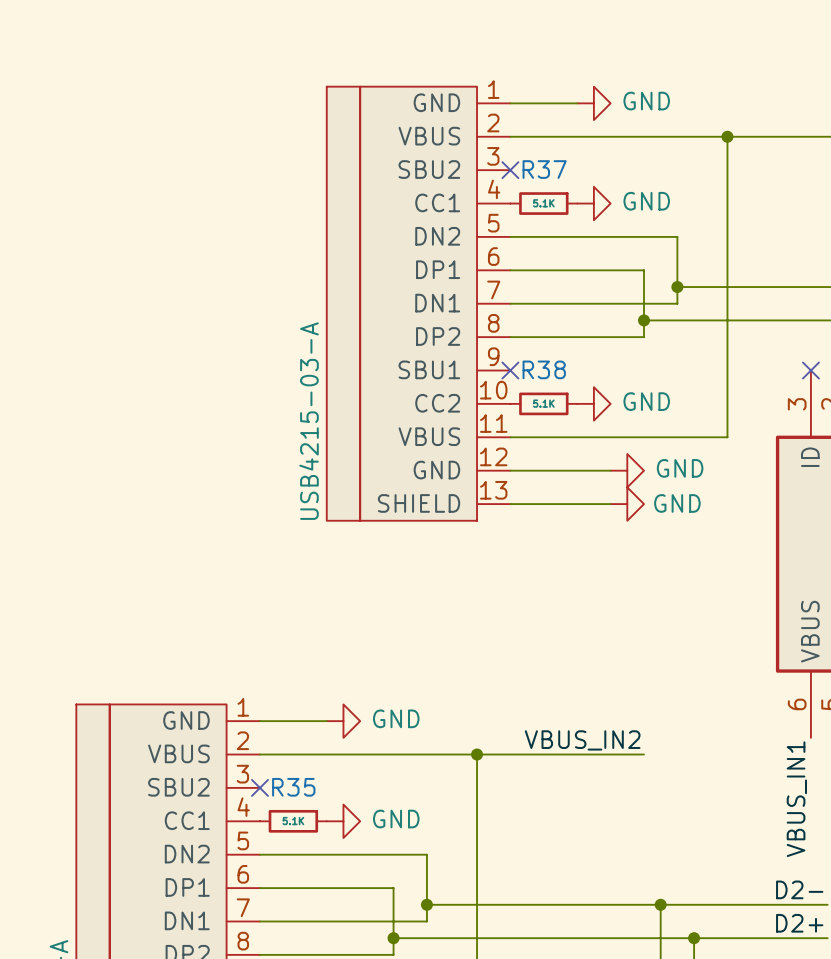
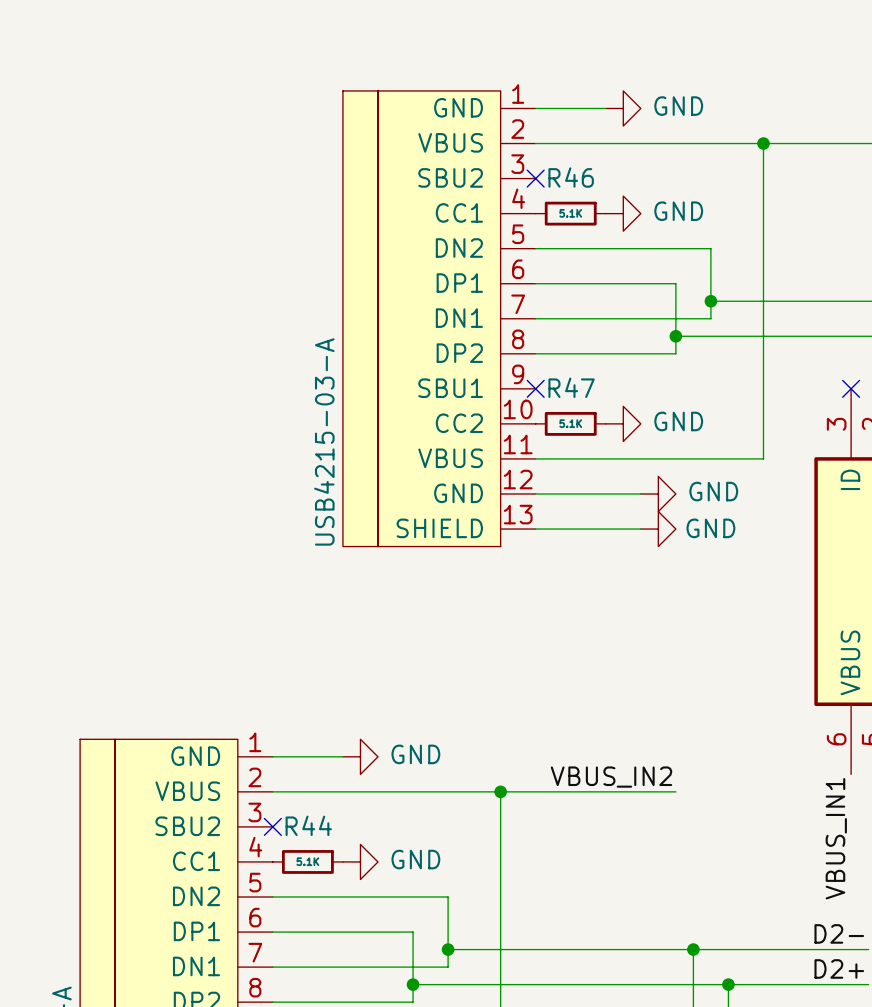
R37 name: R37 (544, 169) -> R46 (571, 177)
R38 name: R38 (544, 369) -> R47 (571, 387)
R35 name: R35 (293, 787) -> R44 (308, 825)

